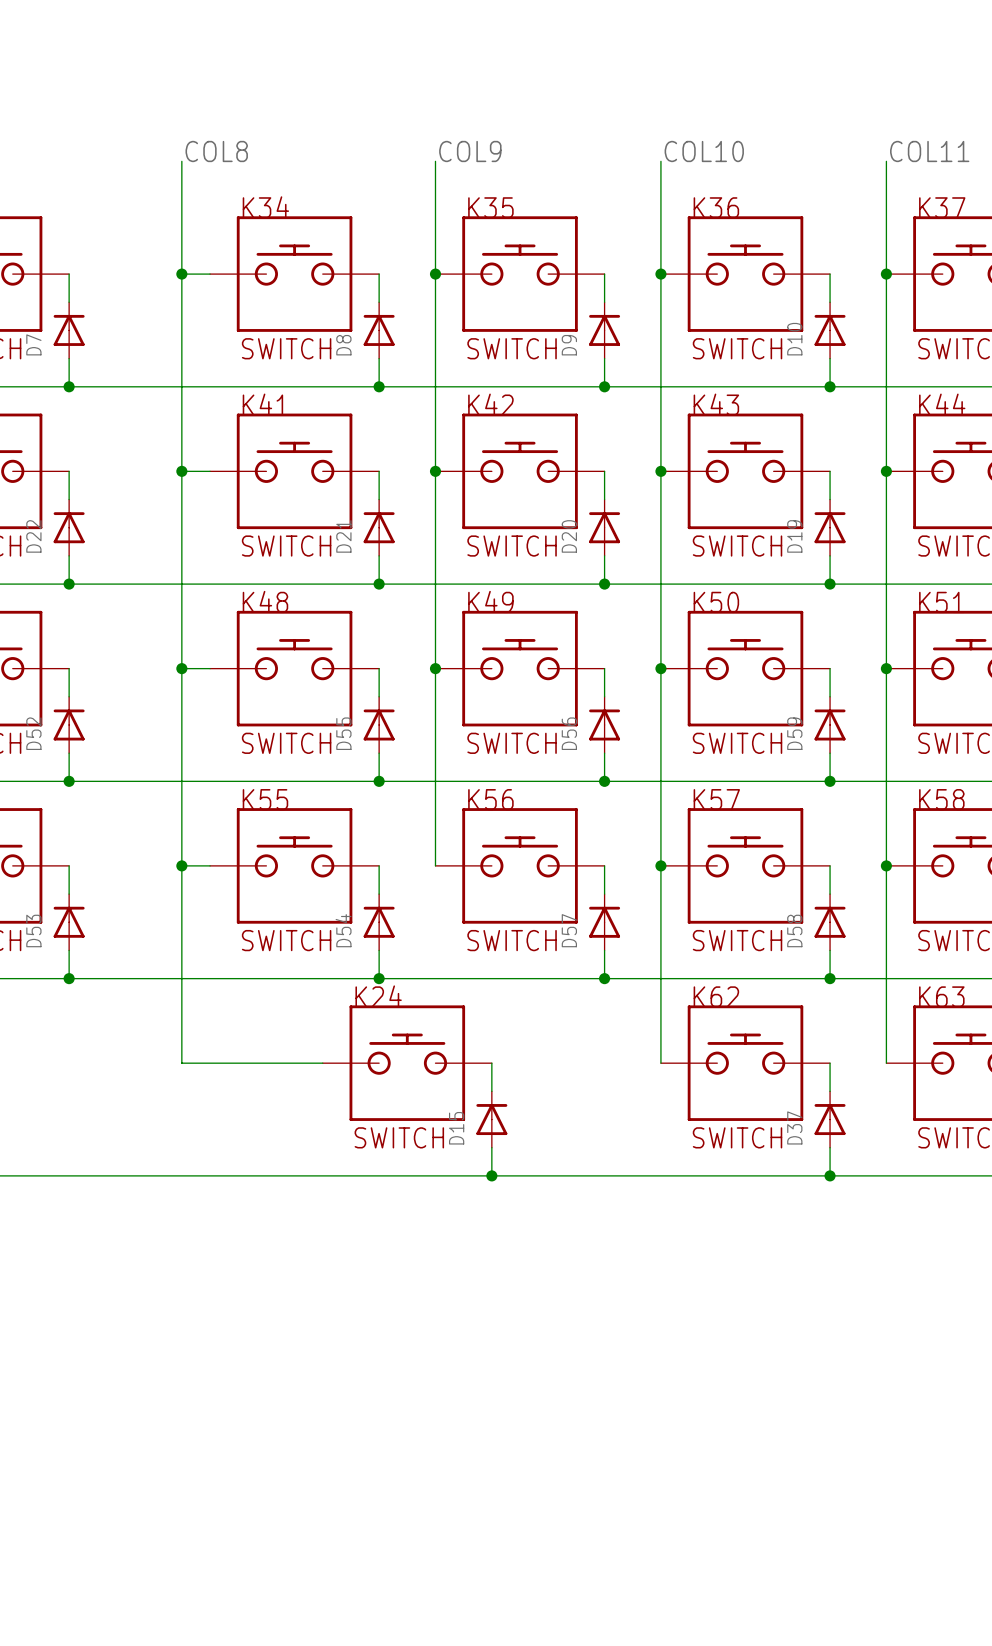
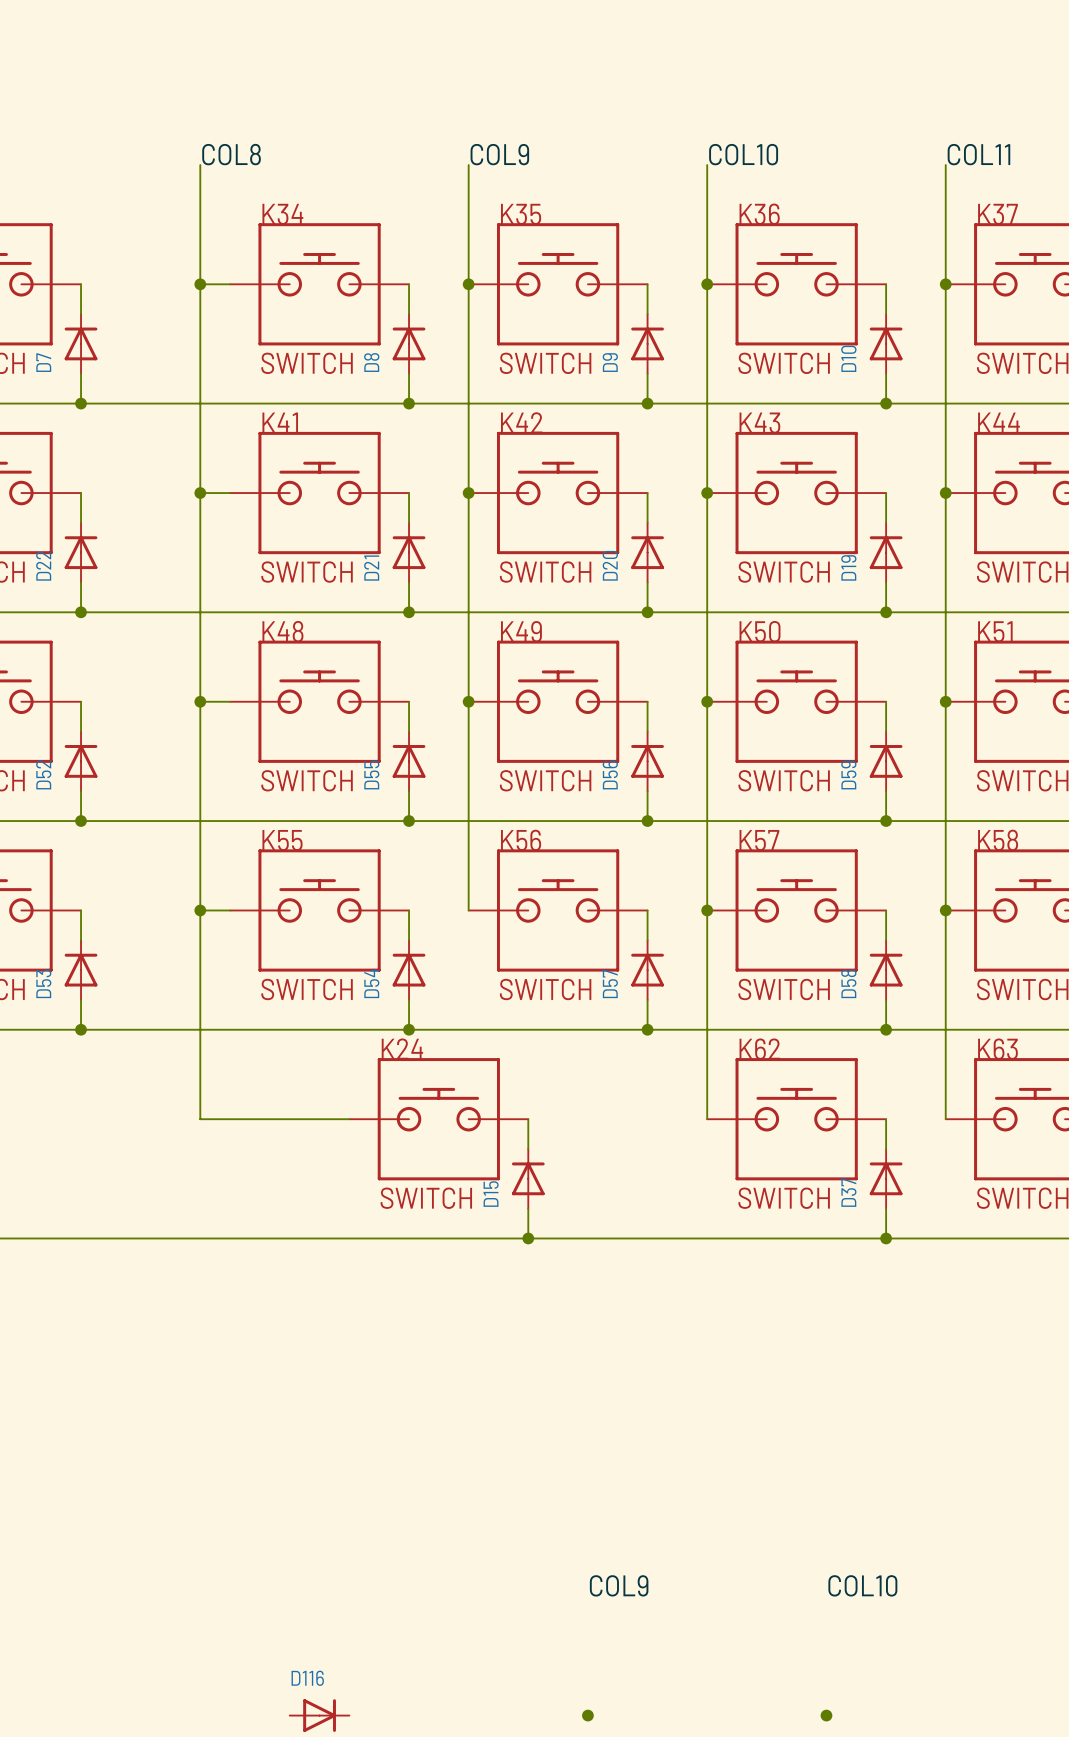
label: none -> COL9 (619, 1585)
label: none -> COL10 (862, 1585)
D116: none -> (319, 1715)
junction: none -> (587, 1715)
junction: none -> (826, 1715)

